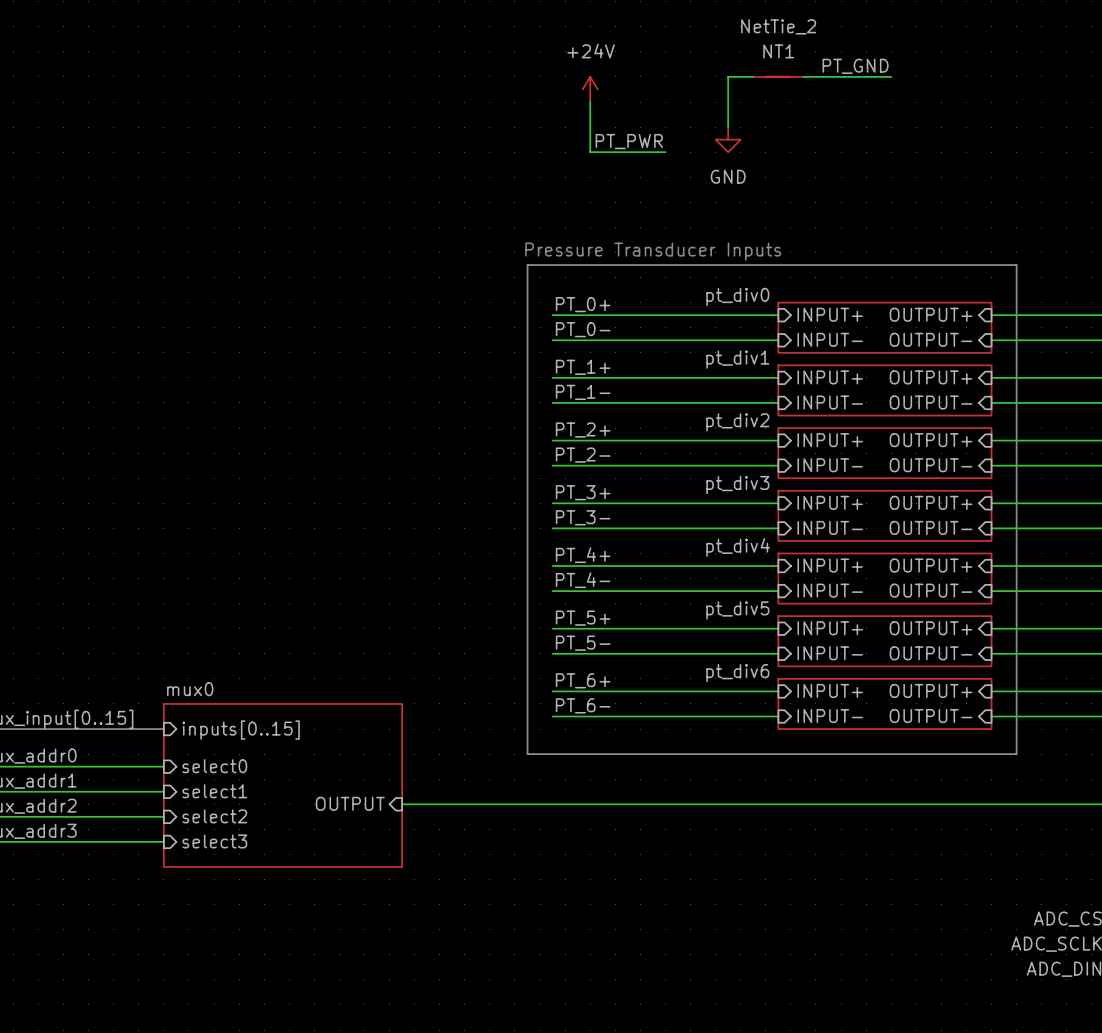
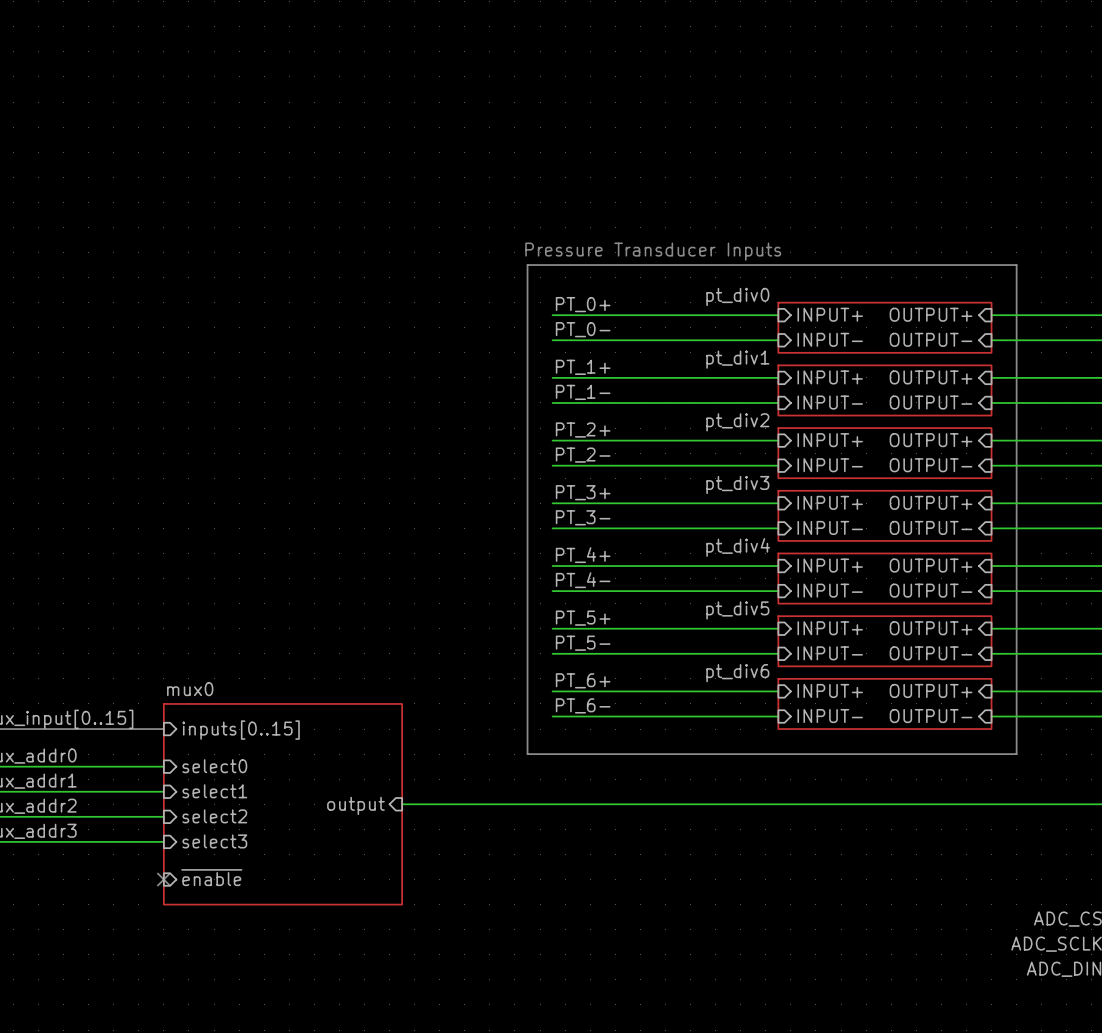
label: PT_GND (855, 66) -> none
wire: (753, 76) (728, 76) (728, 127) -> none
NT1: NetTie_2 (778, 76) -> none
wire: (803, 76) (891, 76) -> none
power symbol: +24V (590, 89) -> none
wire: (590, 102) (590, 152) (665, 152) -> none
power symbol: GND (728, 139) -> none
label: PT_PWR (629, 141) -> none
sheet mux0 shape: [163, 703, 403, 868] -> [163, 703, 403, 906]
sheet pin: OUTPUT (350, 803) -> output (355, 805)
sheet pin: none -> ~{enable} (211, 877)
no-connect mark: none -> (163, 879)

